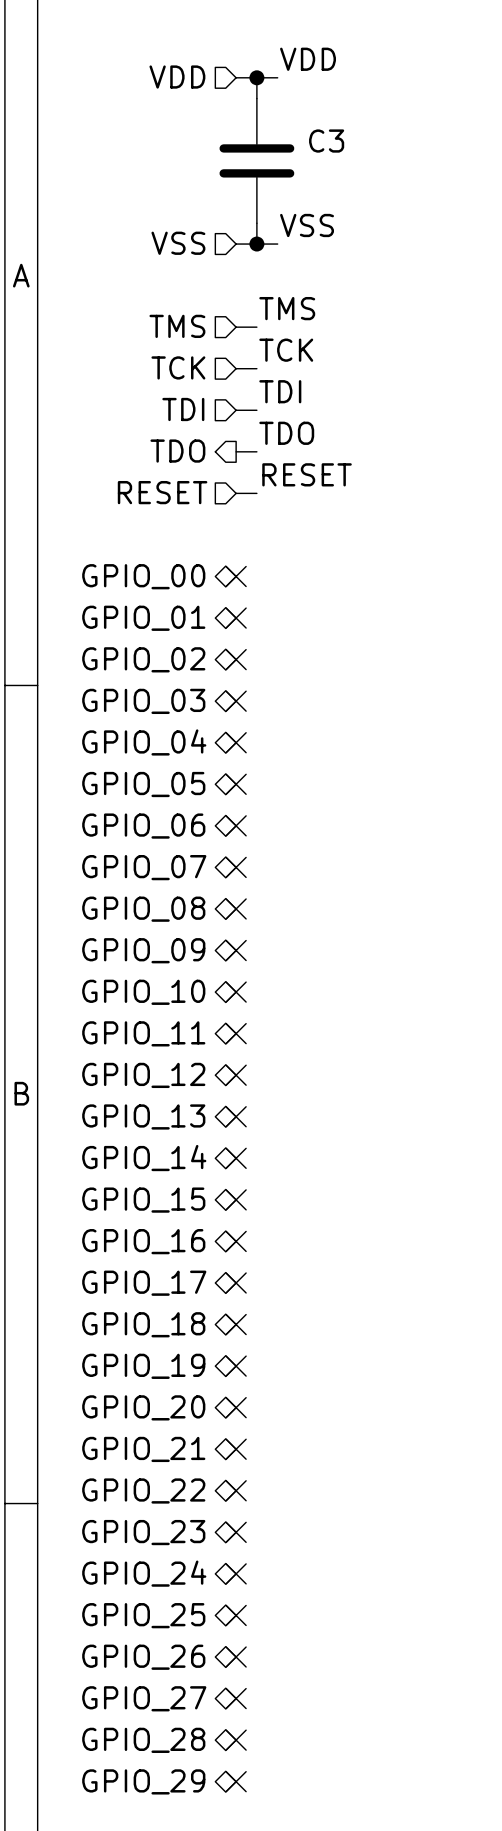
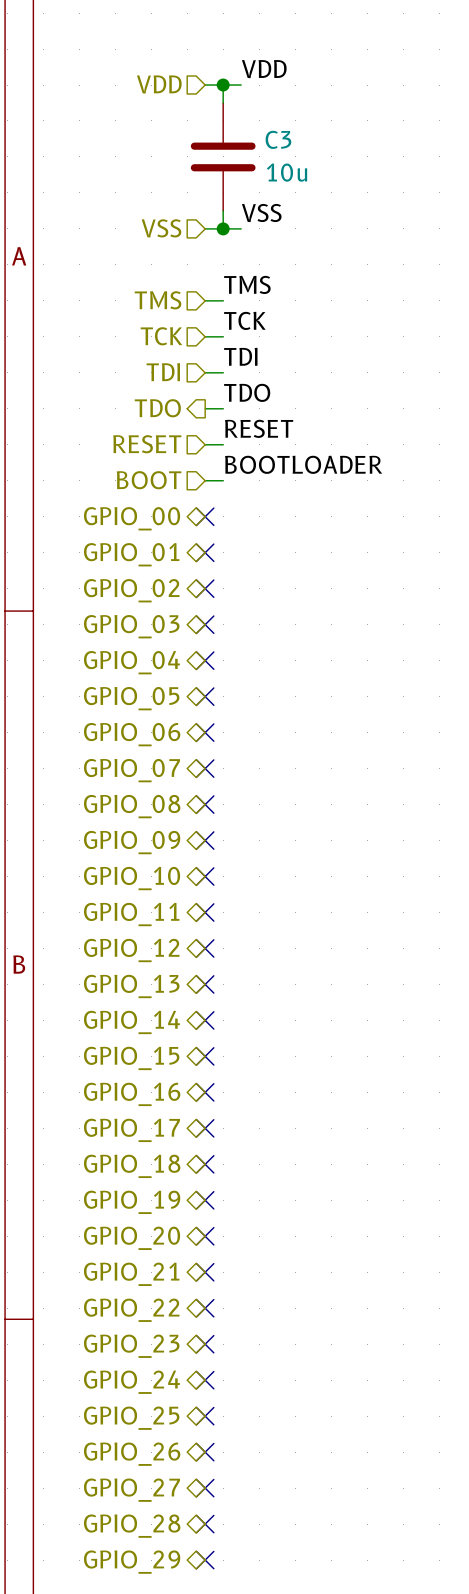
C3 value: none -> 10u (287, 172)
label: none -> BOOTLOADER (303, 464)
hierarchical label: none -> BOOT (149, 480)
wire: none -> (205, 480) (223, 480)

